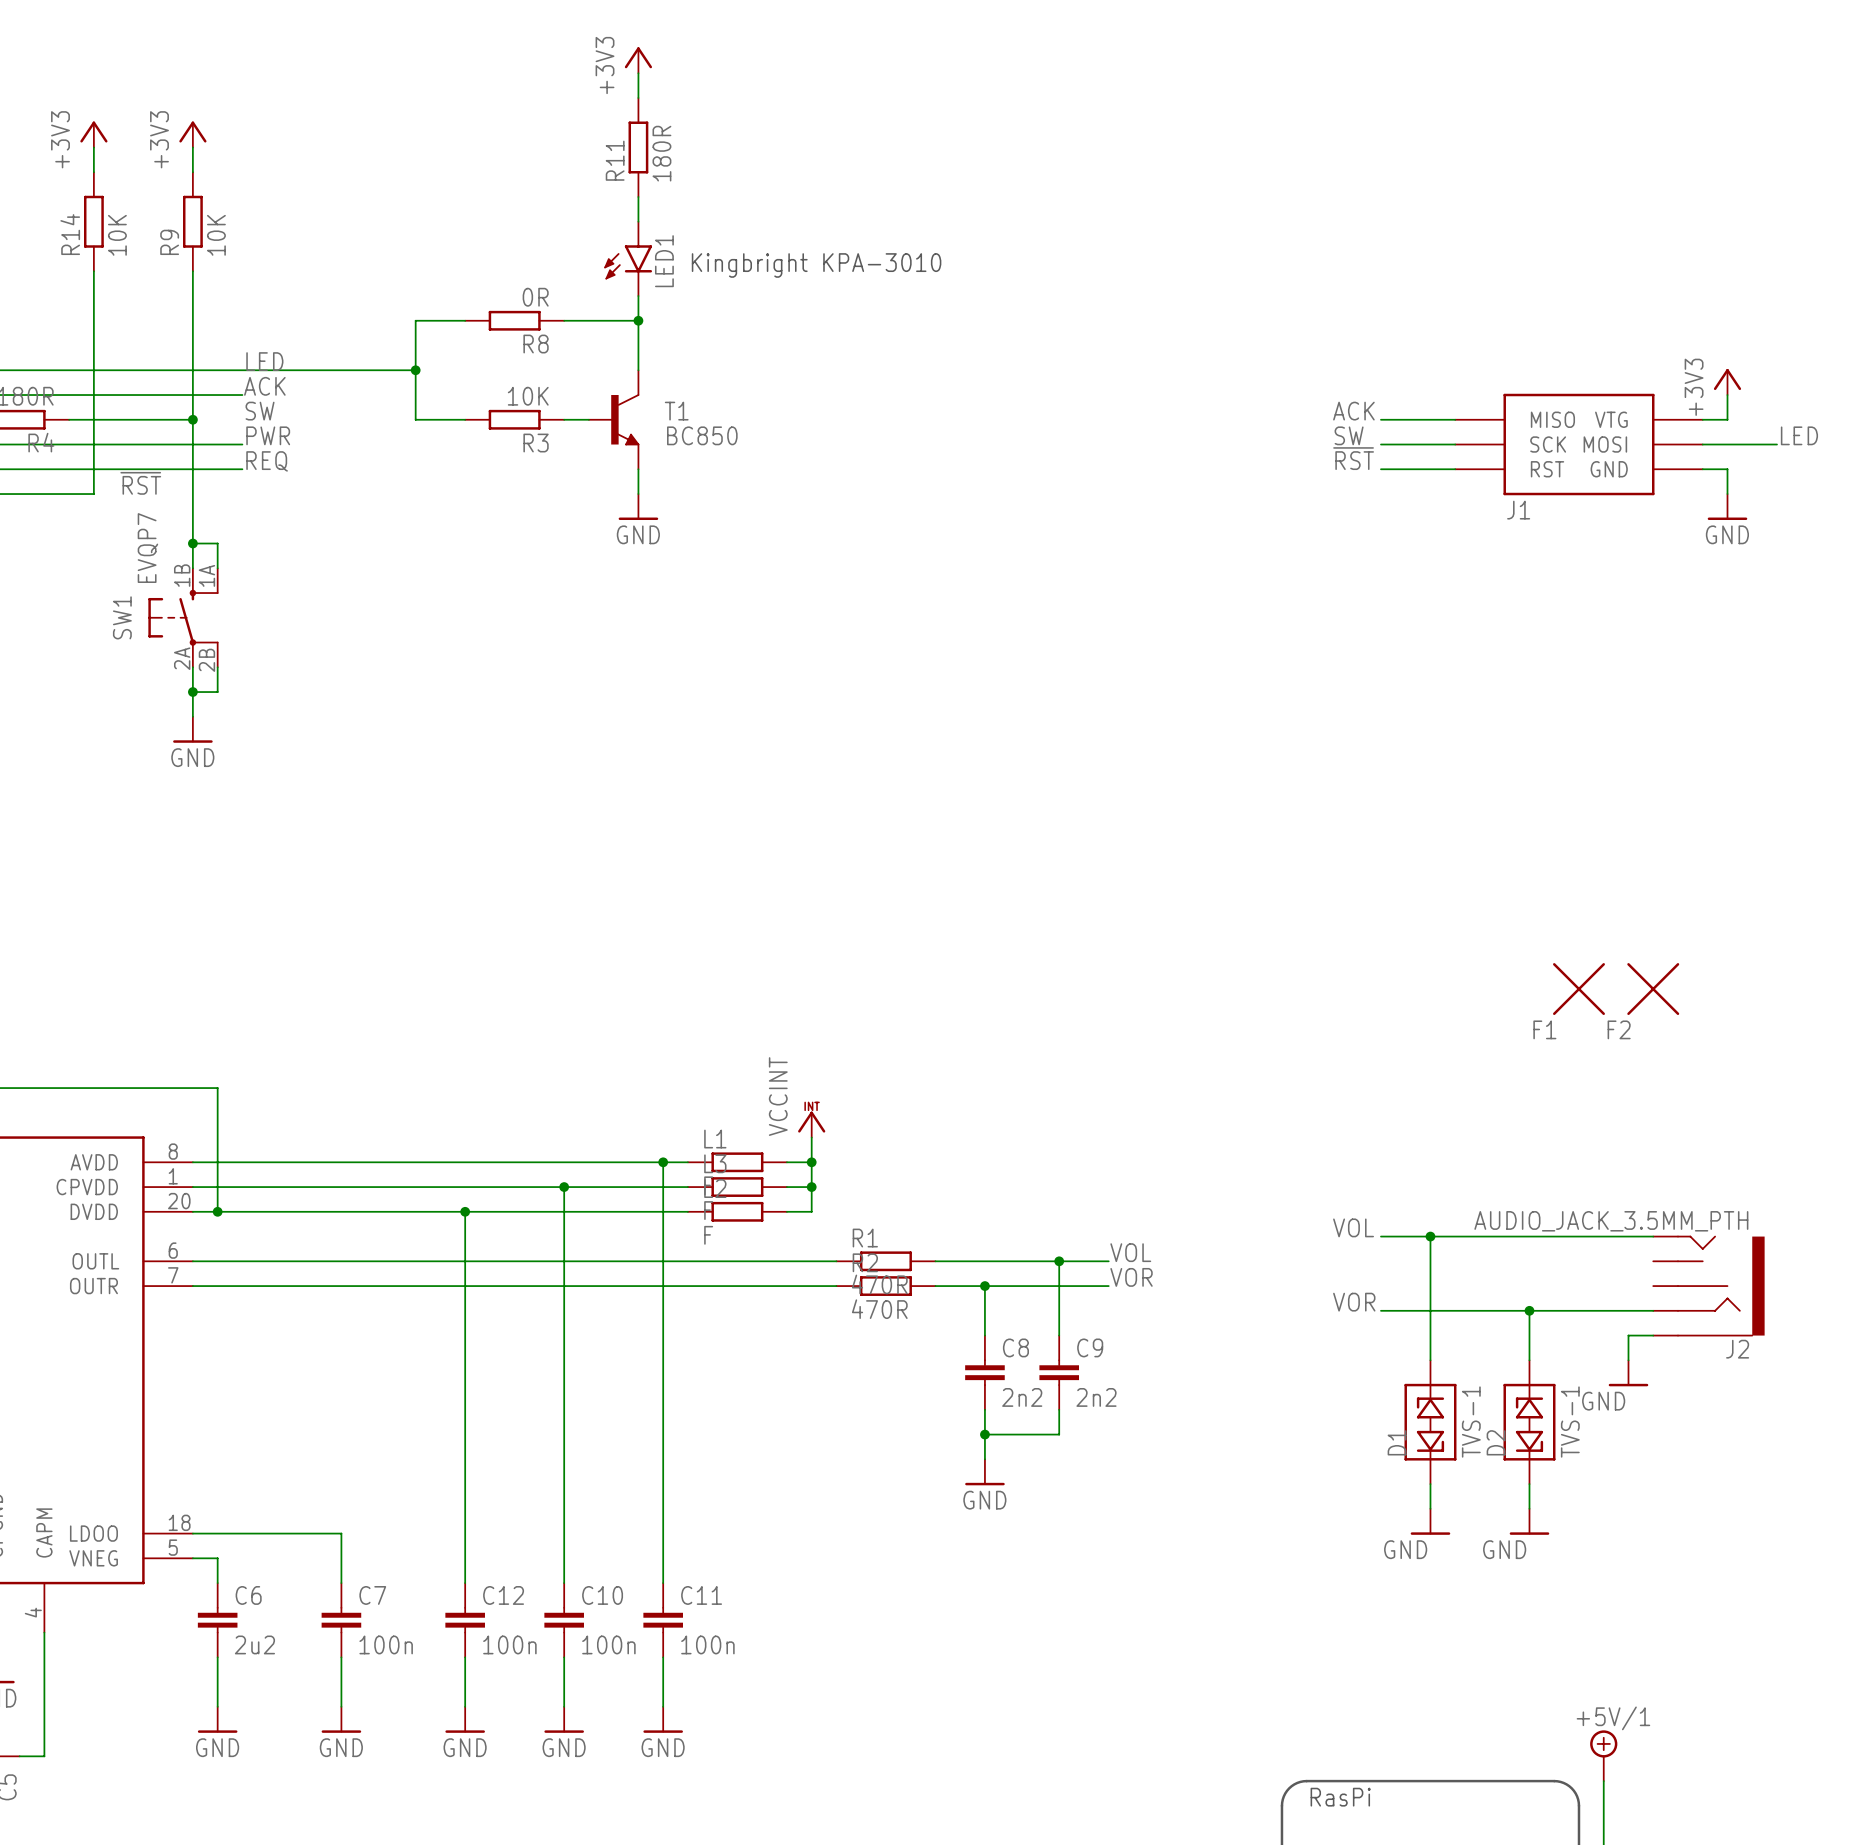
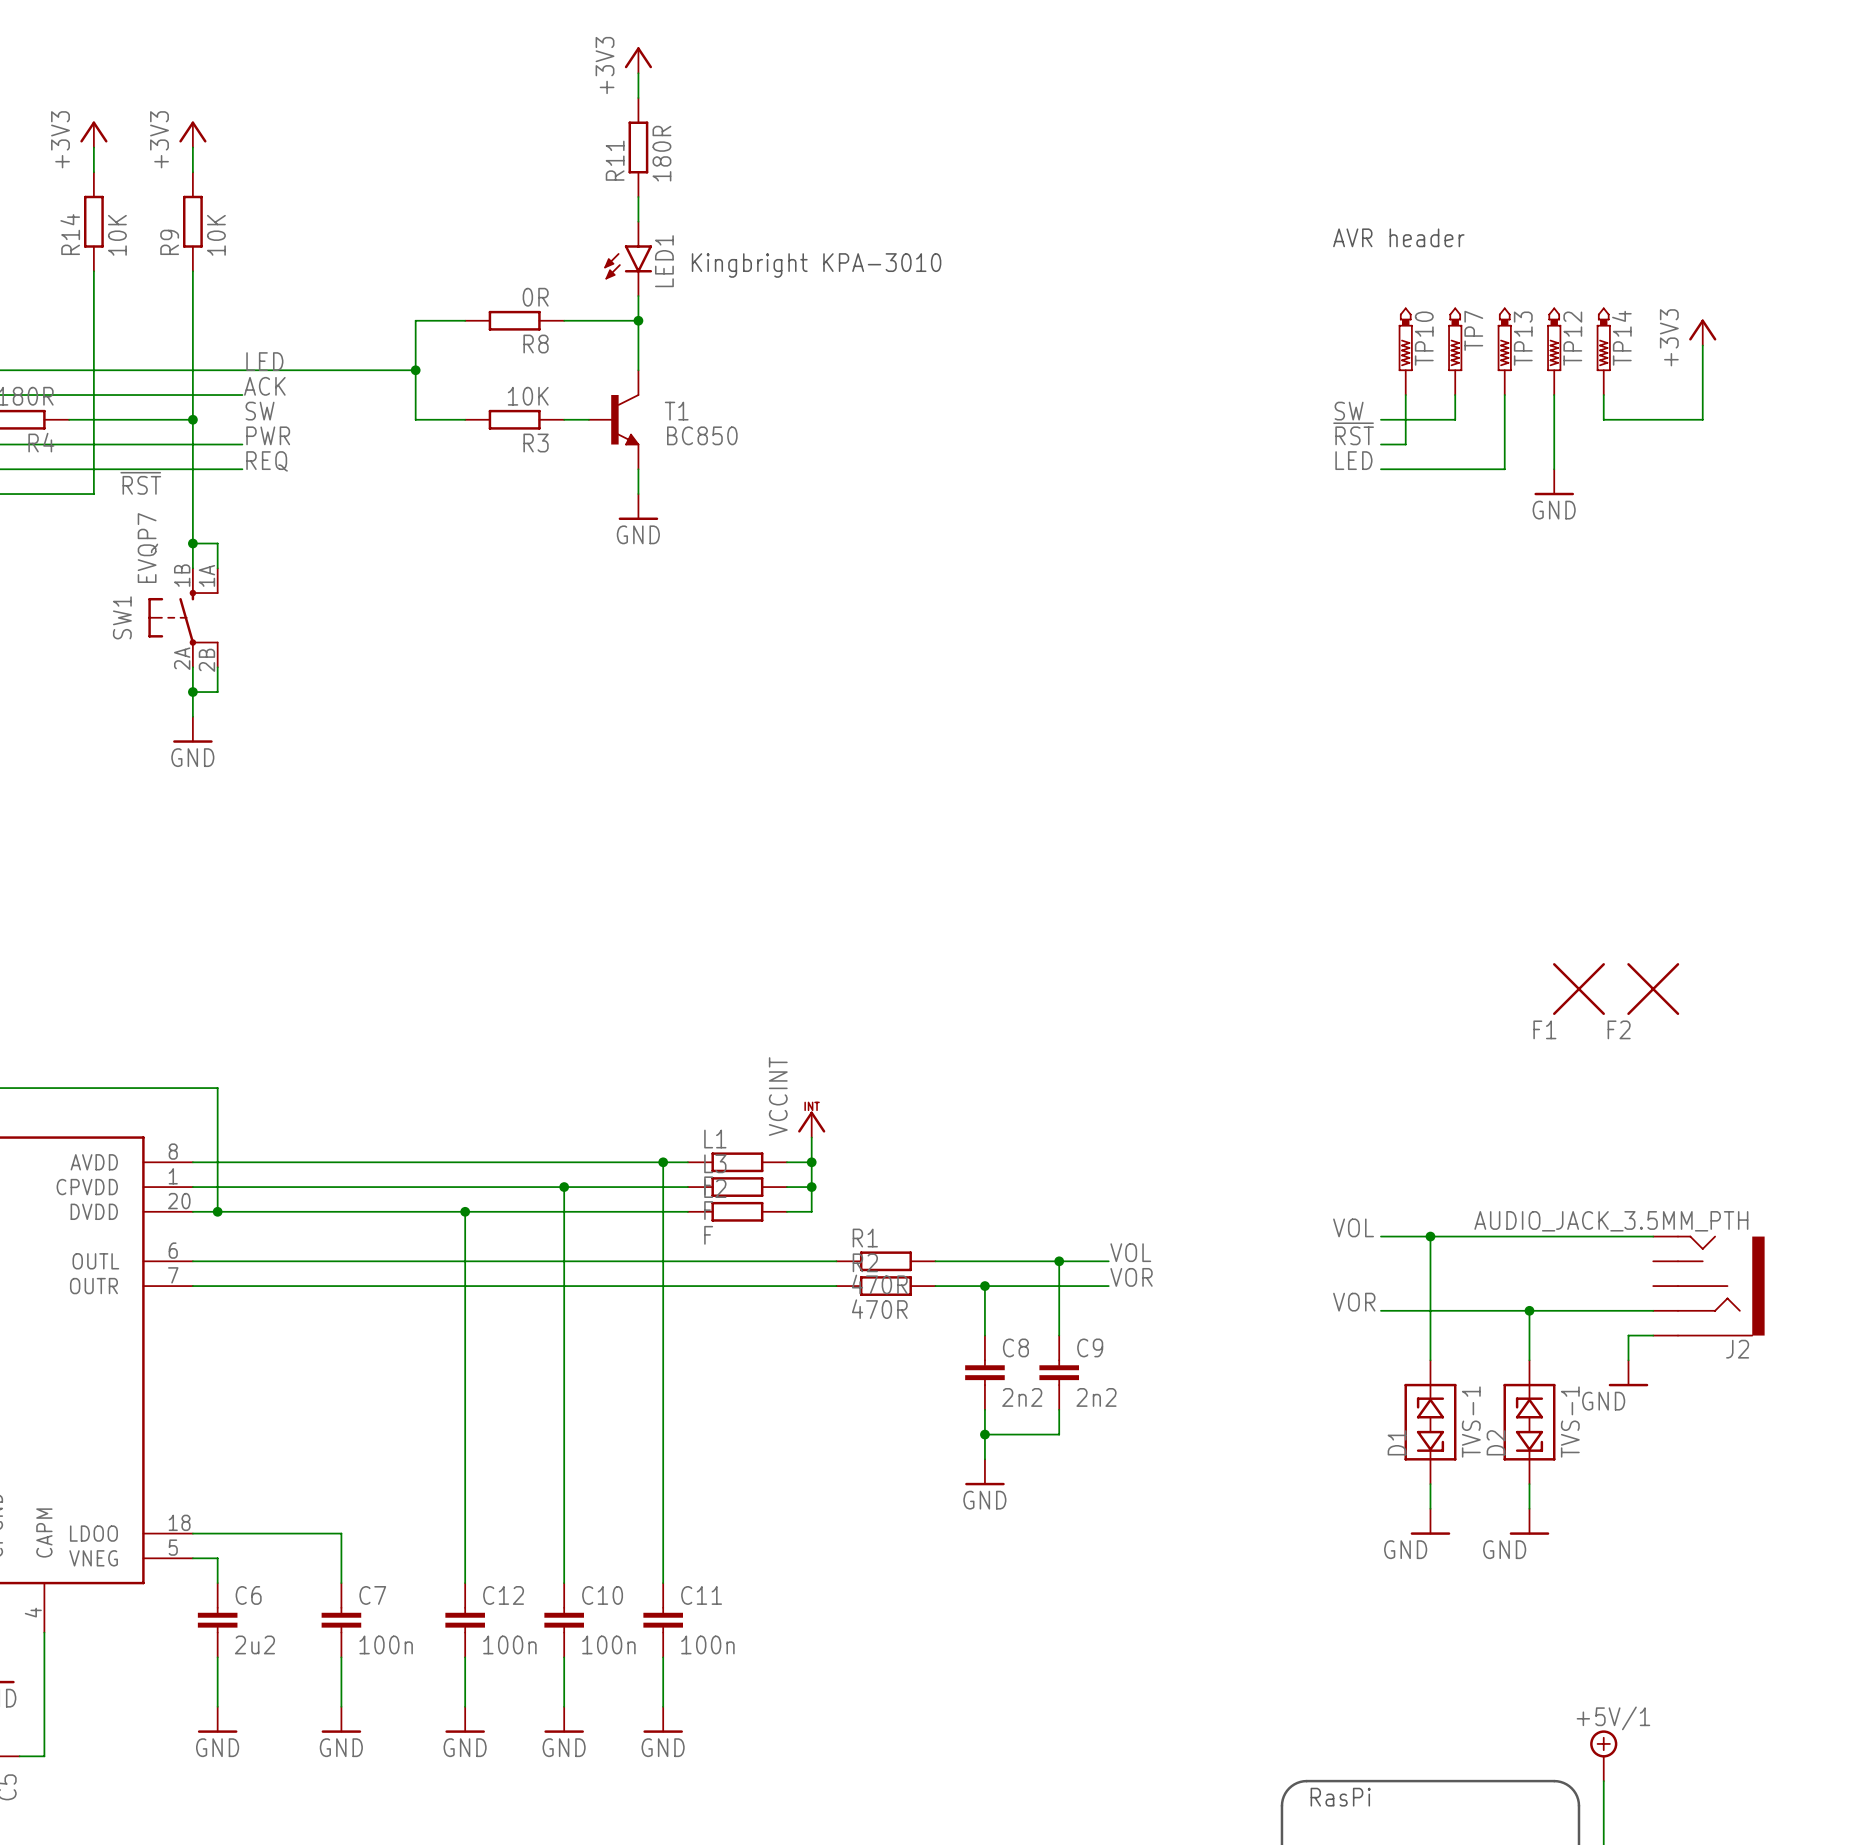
text: none -> AVR header (1398, 237)
wire: none -> (1702, 345) (1702, 419) (1603, 419) (1603, 395)
TP10: none -> (1405, 351)
TP7: none -> (1455, 351)
TP13: none -> (1504, 351)
TP12: none -> (1554, 351)
TP14: none -> (1603, 351)
power symbol position: +3V3 (1727, 382) -> +3V3 (1702, 332)
wire: none -> (1455, 395) (1455, 419)
wire: none -> (1554, 395) (1554, 469)
wire: (1727, 395) (1727, 419) (1702, 419) -> none
label: ACK (1353, 411) -> SW (1349, 411)
label: SW (1349, 435) -> ~{RST} (1353, 433)
label: LED (1799, 435) -> none
wire: (1405, 444) (1455, 444) -> (1405, 444) (1405, 395)
J1: (1578, 444) -> none
wire: (1702, 444) (1777, 444) -> none
label: ~{RST} (1353, 458) -> LED (1353, 460)
wire: (1702, 469) (1727, 469) (1727, 494) -> none
power symbol position: GND (1727, 507) -> GND (1554, 482)

